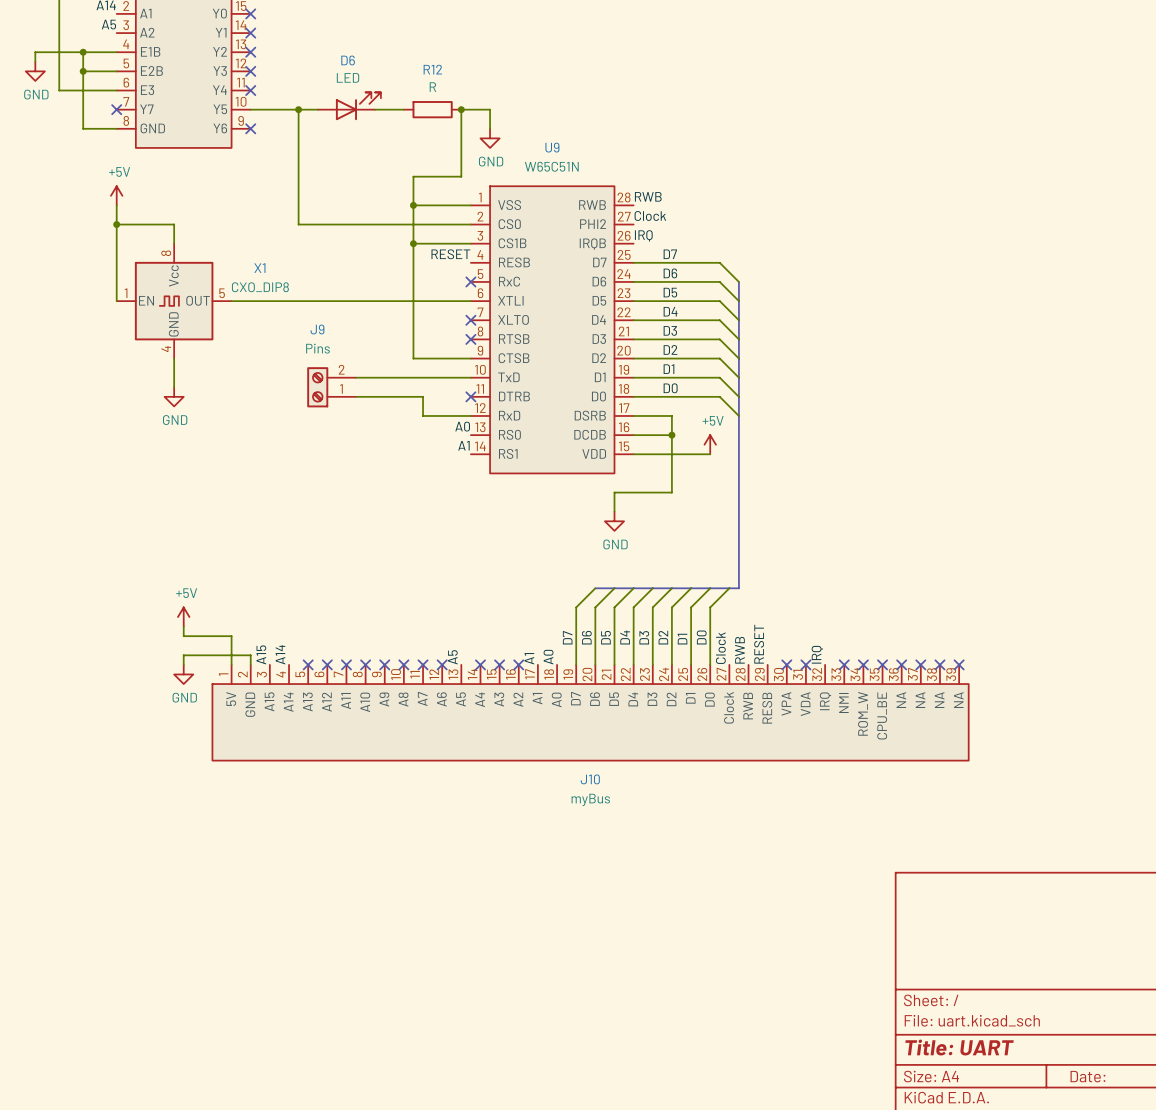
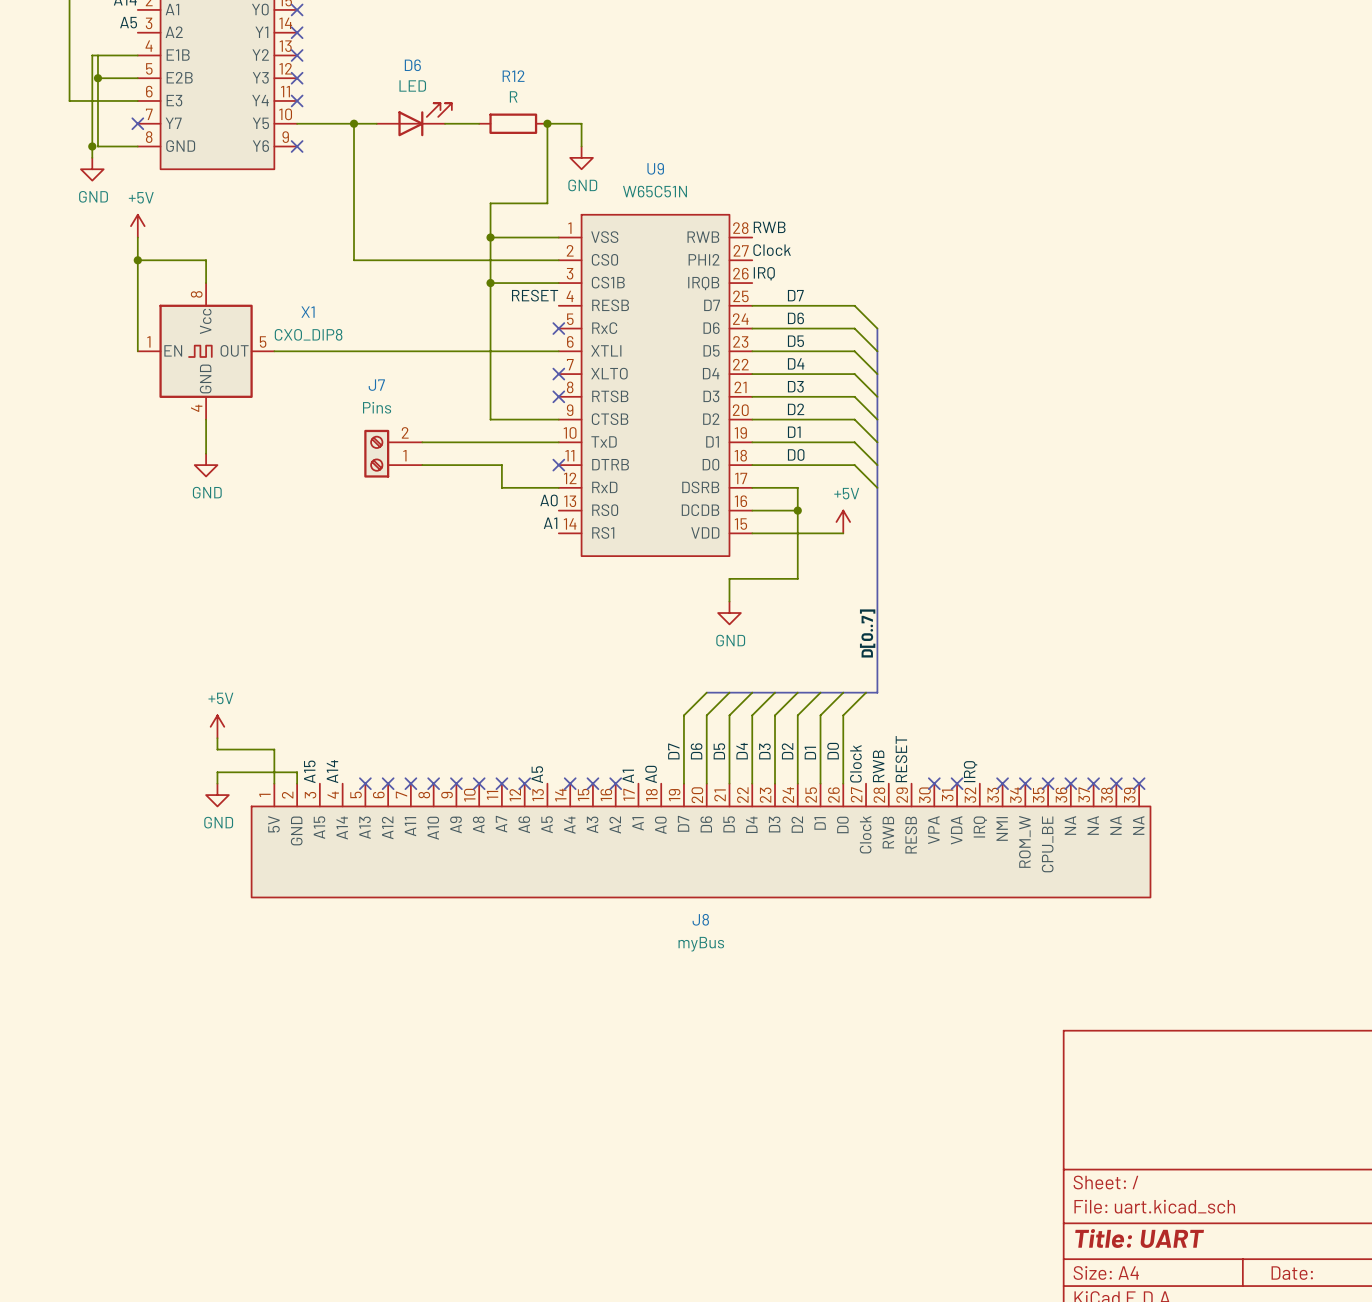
wire: (78, 52) (35, 52) (35, 61) -> (92, 55) (92, 157)
junction: (83, 52) -> none
power symbol position: GND (35, 71) -> GND (92, 169)
junction: none -> (92, 146)
J9 name: J9 (317, 329) -> J7 (376, 385)
label: none -> D[0..7] (867, 633)
J10 name: J10 (590, 779) -> J8 (700, 919)

